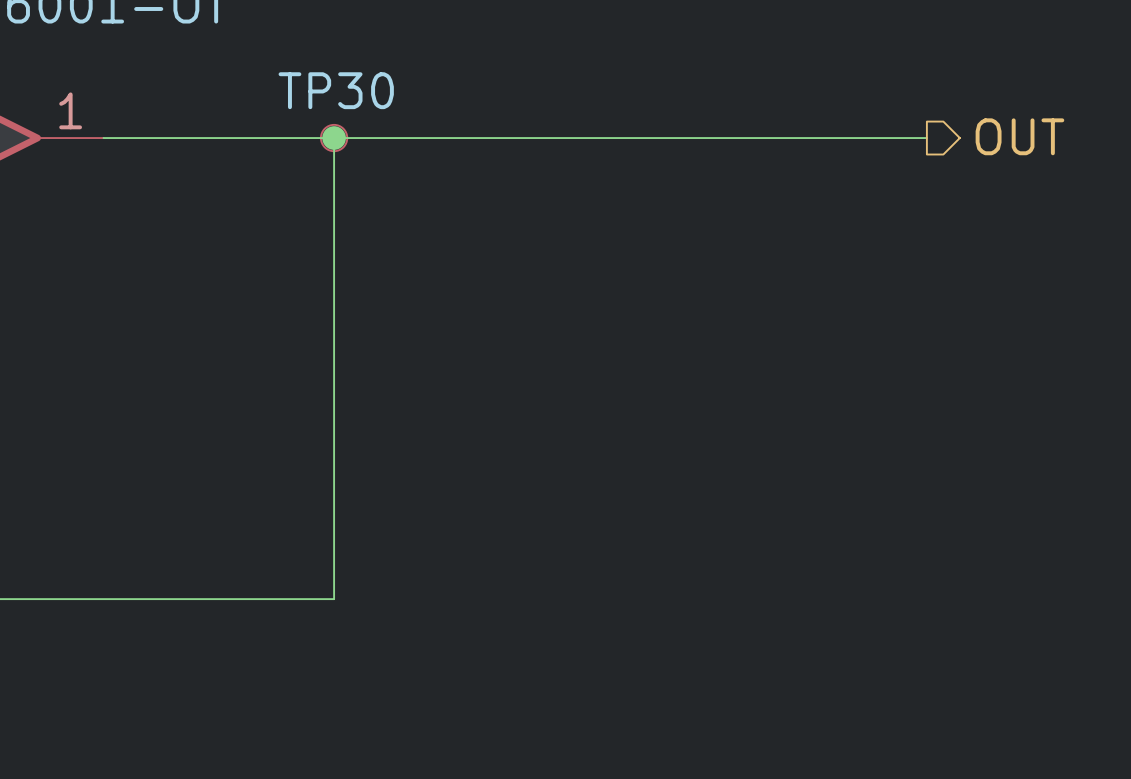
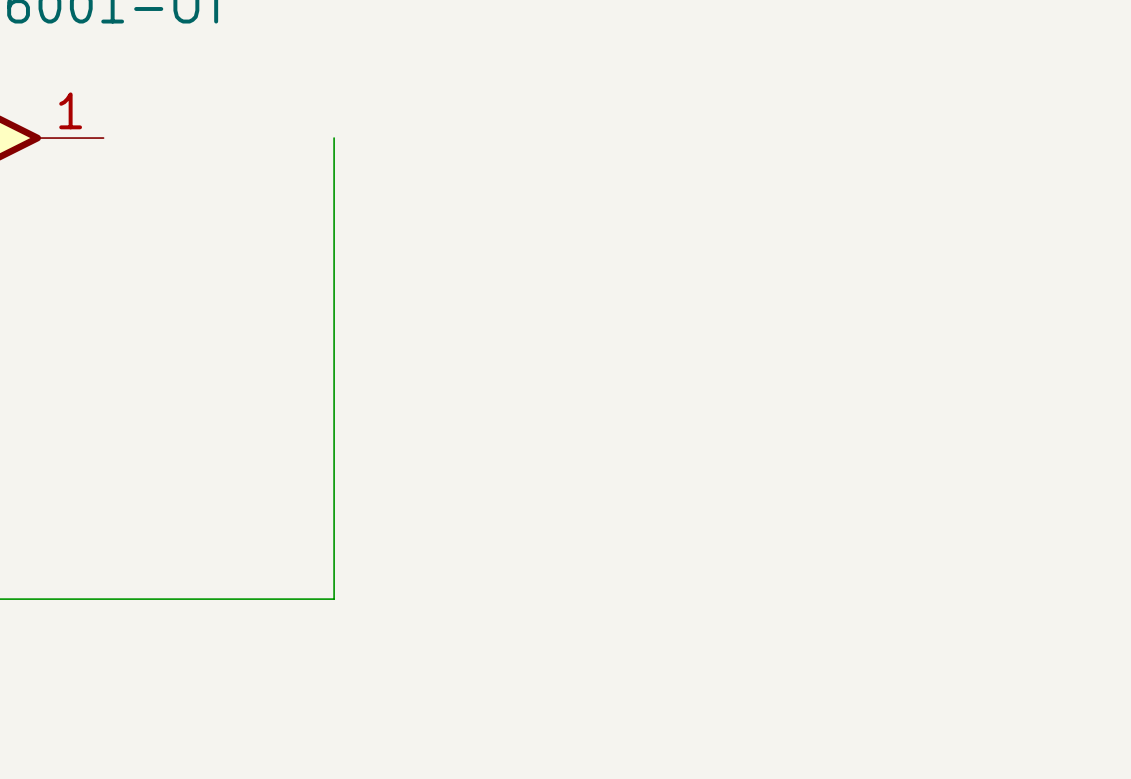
hierarchical label: OUT (1019, 136) -> none
wire: (103, 138) (926, 138) -> none
junction: (334, 138) -> none
TP30: (334, 138) -> none

